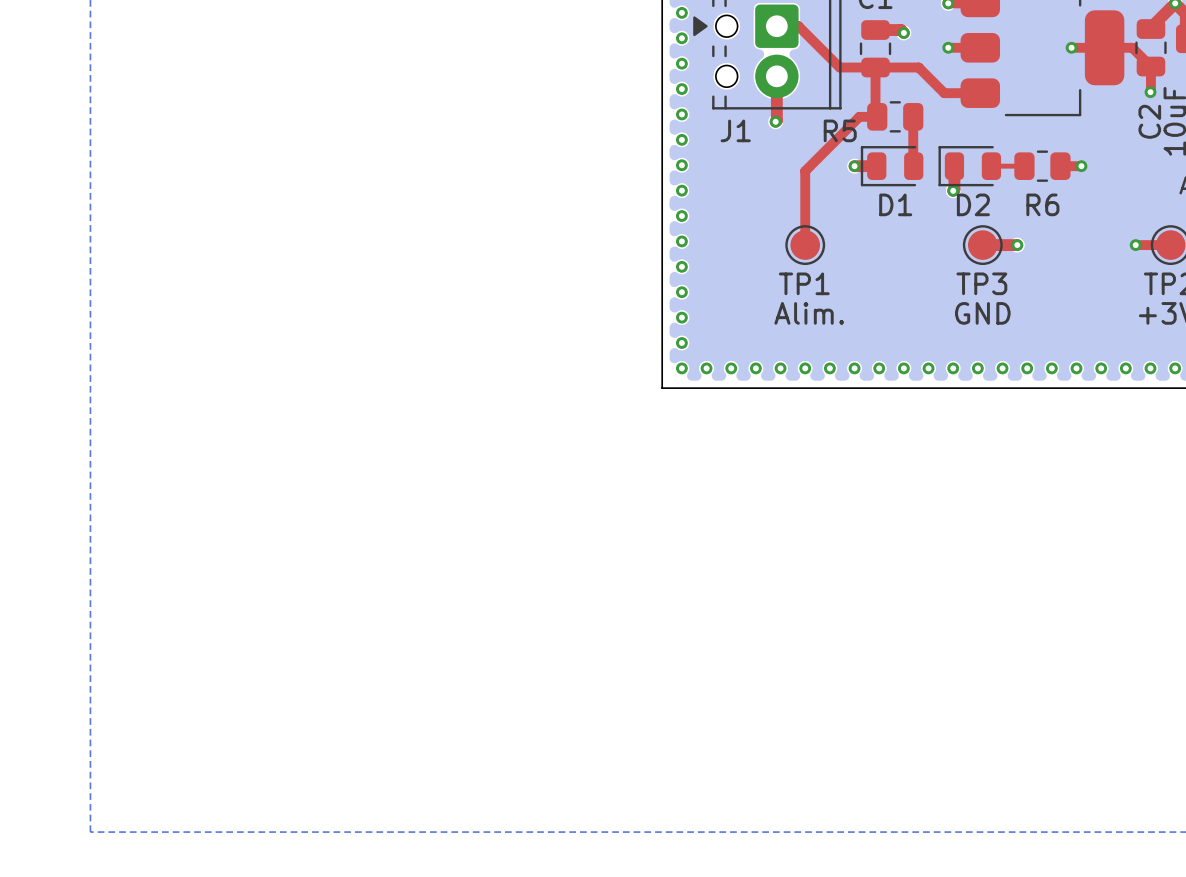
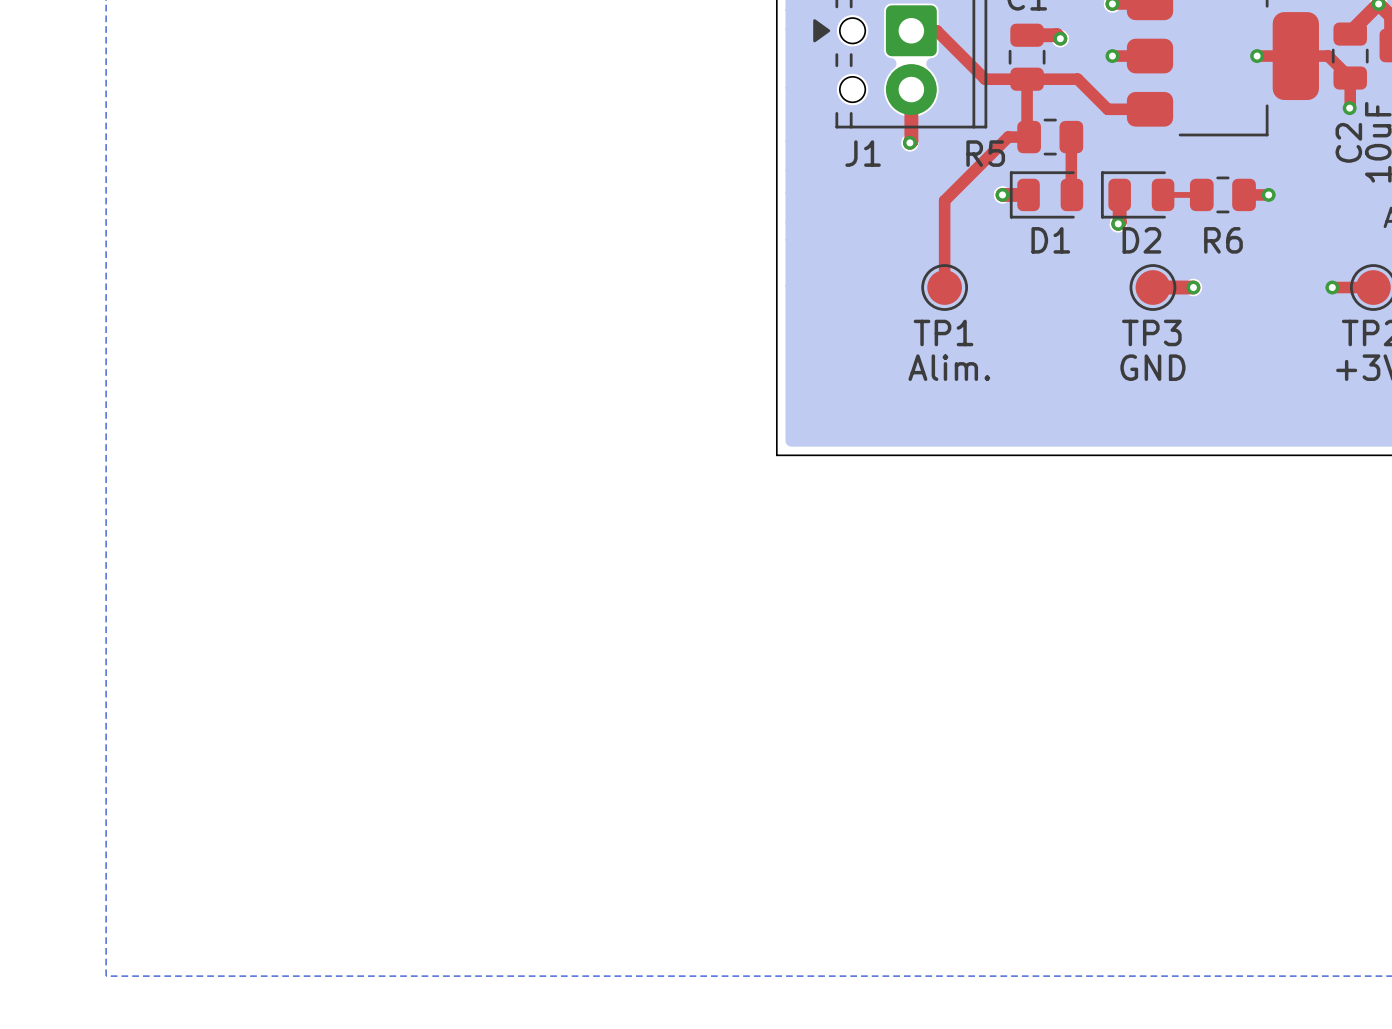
via: (681, 12) -> none
via: (681, 38) -> none
via: (681, 63) -> none
via: (681, 89) -> none
via: (681, 114) -> none
via: (681, 139) -> none
via: (681, 165) -> none
via: (681, 190) -> none
via: (681, 216) -> none
via: (681, 241) -> none
via: (681, 266) -> none
via: (681, 292) -> none
via: (681, 317) -> none
via: (681, 343) -> none
via: (681, 368) -> none
via: (706, 368) -> none
via: (731, 368) -> none
via: (755, 368) -> none
via: (780, 368) -> none
via: (805, 368) -> none
via: (829, 368) -> none
via: (854, 368) -> none
via: (879, 368) -> none
via: (903, 368) -> none
via: (928, 368) -> none
via: (953, 368) -> none
via: (977, 368) -> none
via: (1002, 368) -> none
via: (1027, 368) -> none
via: (1051, 368) -> none
via: (1076, 368) -> none
via: (1101, 368) -> none
via: (1125, 368) -> none
via: (1150, 368) -> none
via: (1175, 368) -> none

